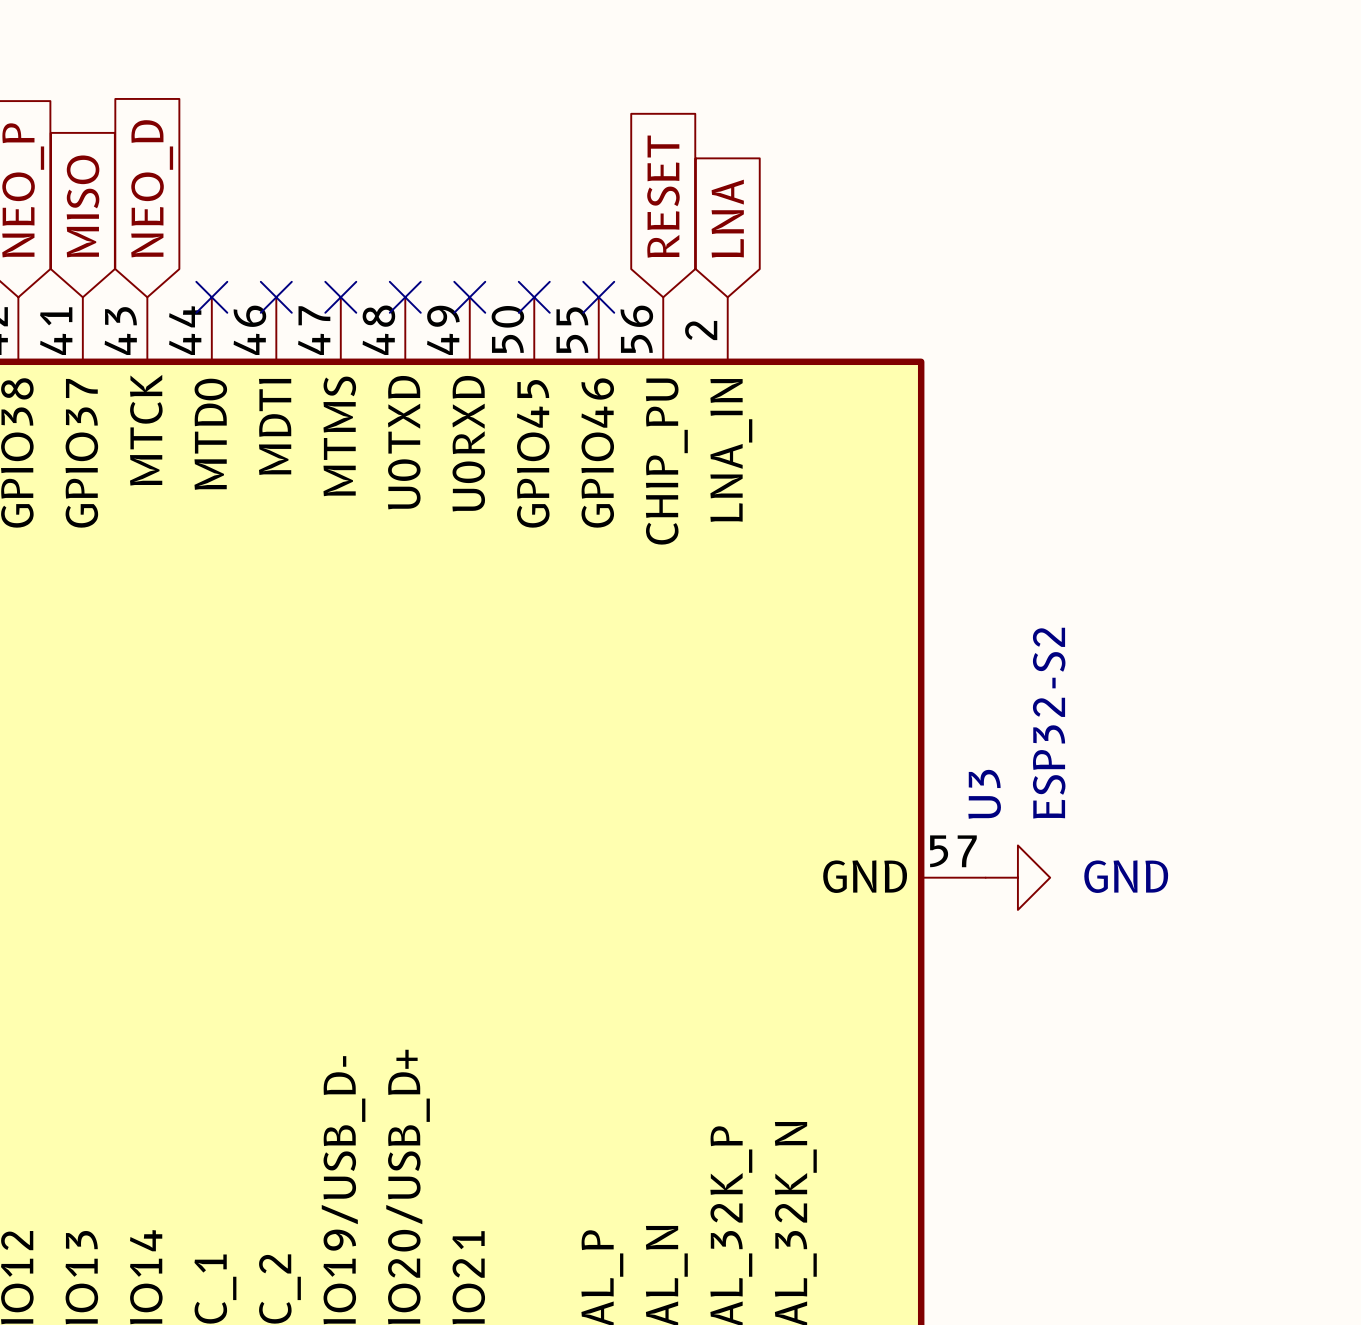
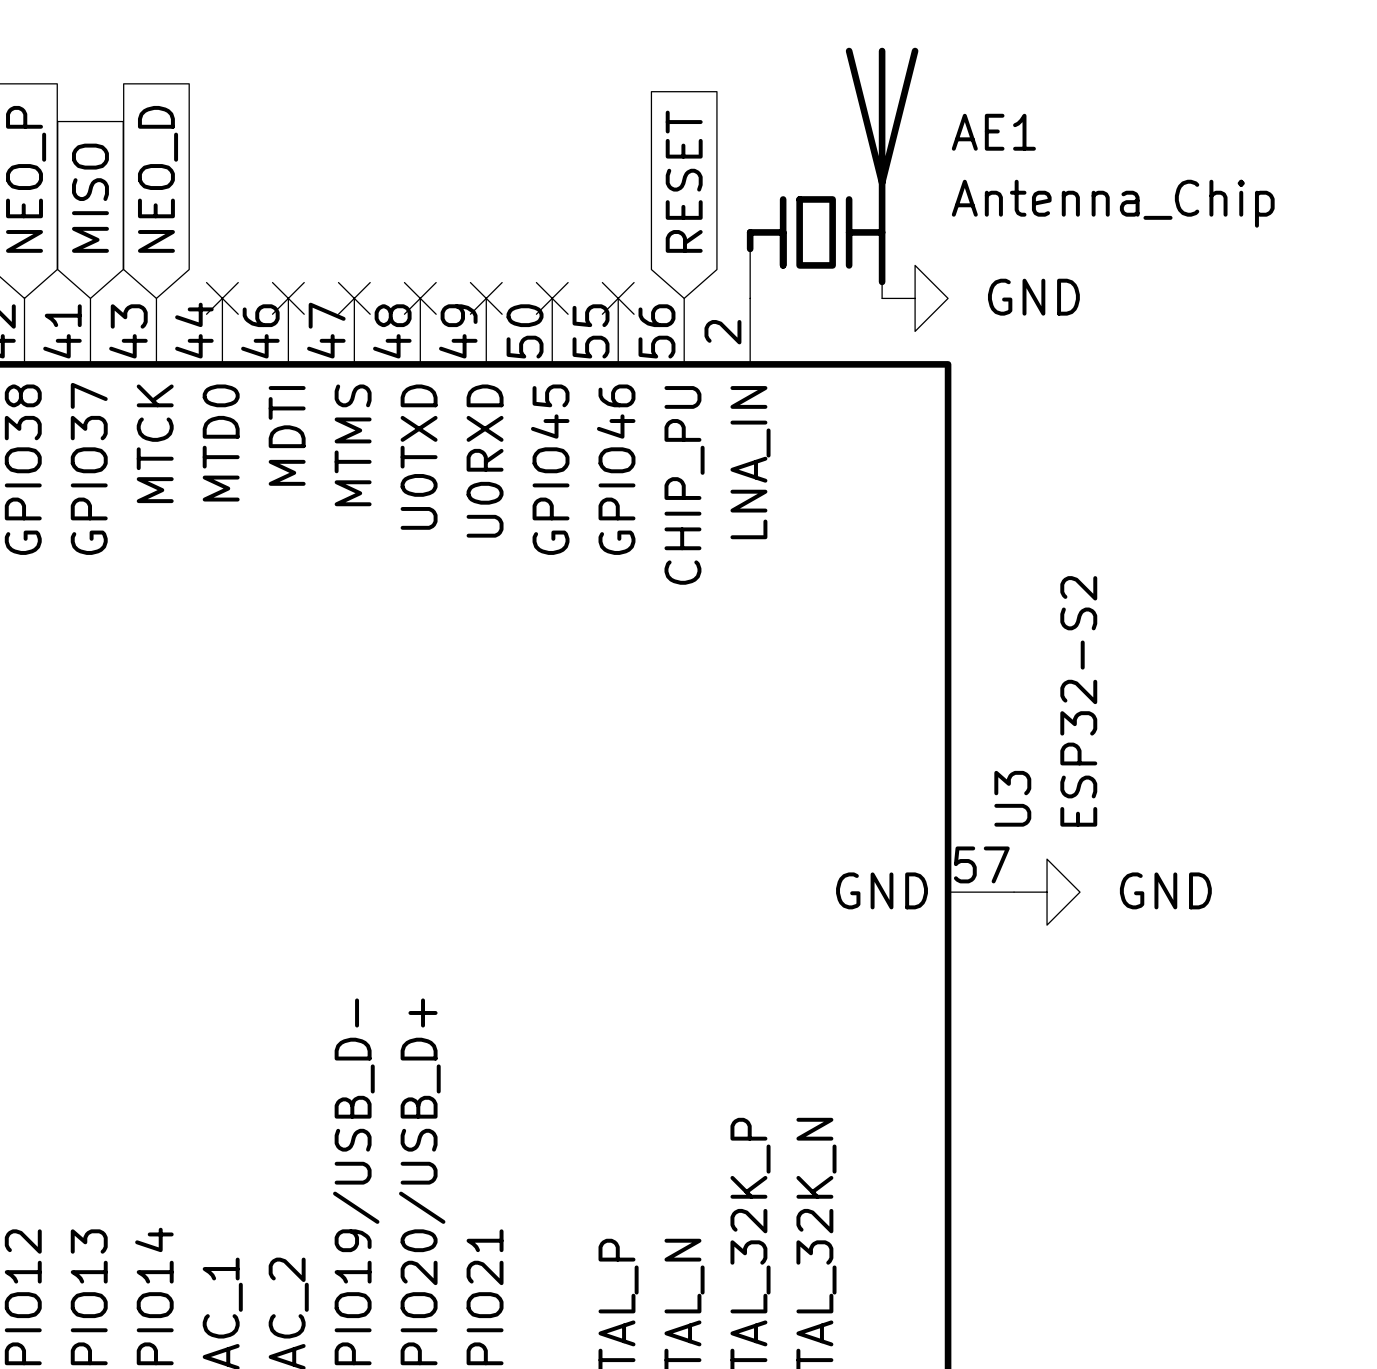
AE1: none -> Antenna_Chip (832, 173)
global label: LNA (727, 218) -> none
power symbol: none -> GND (915, 298)

